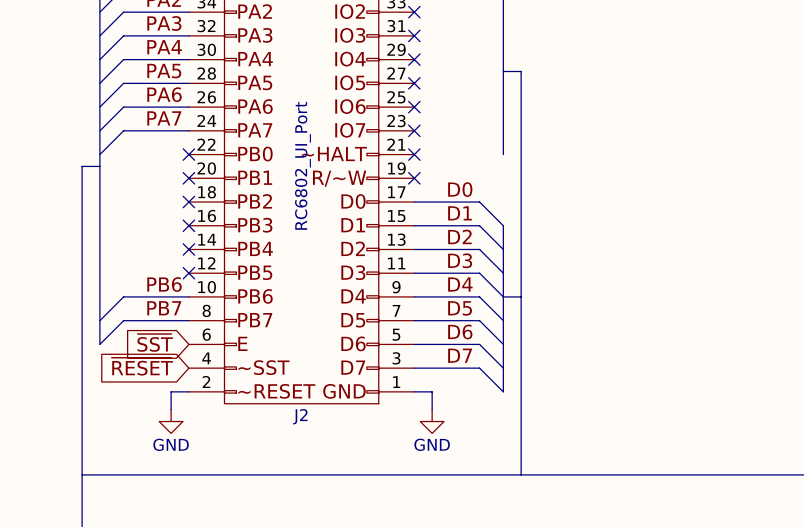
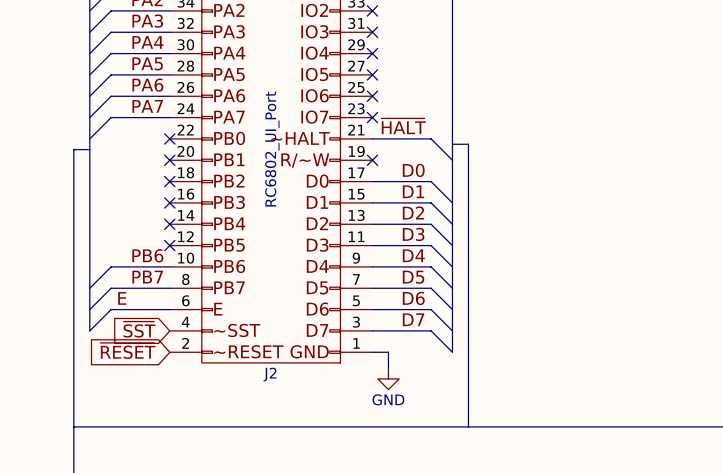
bus: (503, 71) (521, 71) (521, 160) -> (452, 144) (468, 144)
label: none -> ~{HALT} (403, 126)
wire: none -> (372, 138) (431, 138) (452, 160)
no-connect mark: (414, 154) -> none
bus: none -> (452, 138) (452, 202)
bus: (503, 296) (521, 296) -> none
label: none -> E (122, 298)
global label: ~{SST} (155, 342) -> none
bus: none -> (89, 309) (89, 330)
wire: none -> (169, 309) (111, 309) (89, 330)
global label: ~{RESET} (142, 366) -> ~{SST} (139, 329)
global label: none -> ~{RESET} (127, 350)
wire: (188, 391) (171, 391) (171, 409) -> none
power symbol: GND (171, 421) -> none

